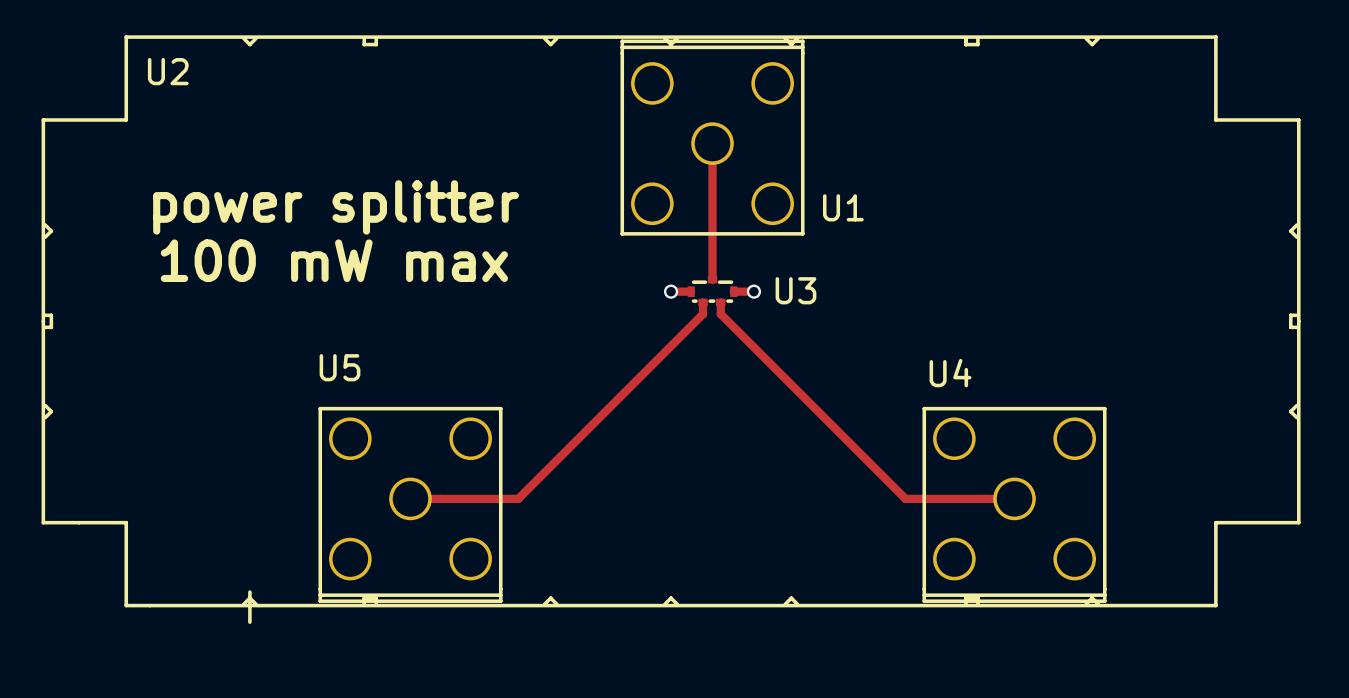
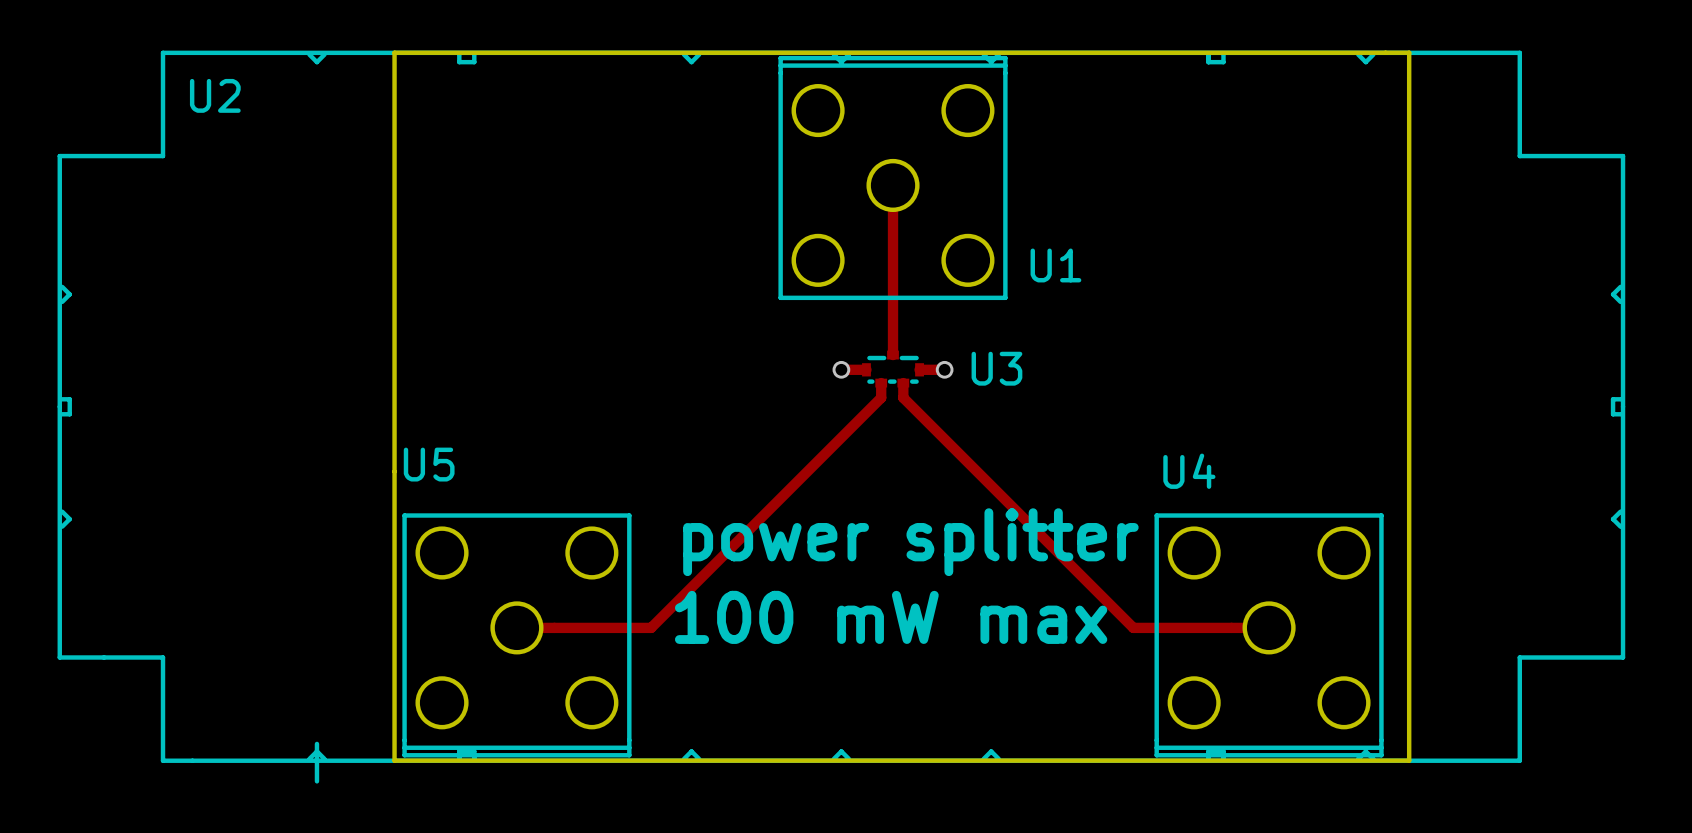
board edge: none -> (394, 52) (1409, 52) (1409, 760) (394, 760) (394, 52)
text position: power splitter (336, 207) -> power splitter (910, 542)
text position: 100 mW max (334, 260) -> 100 mW max (891, 617)

